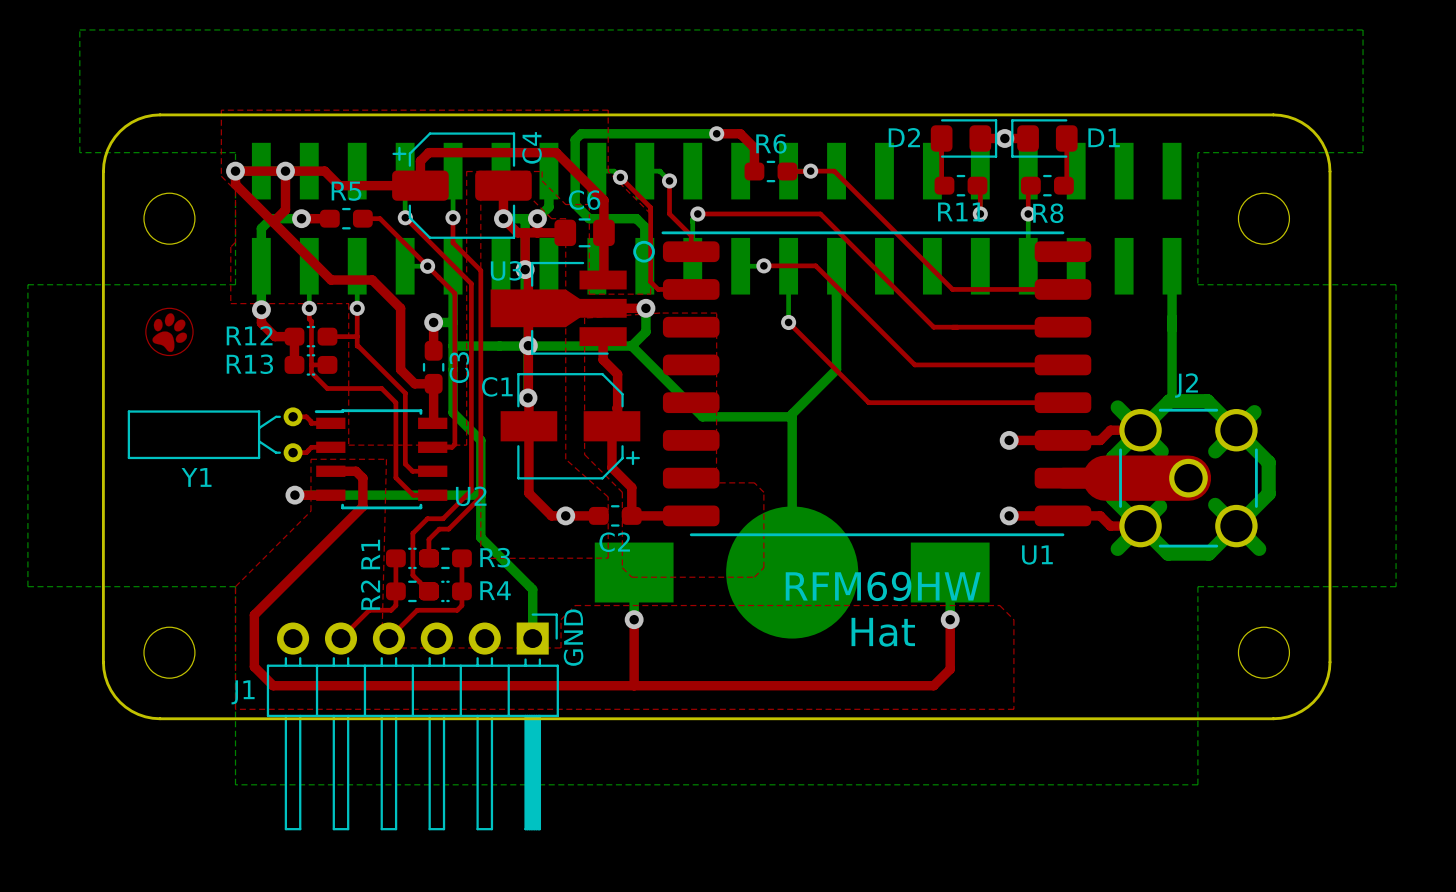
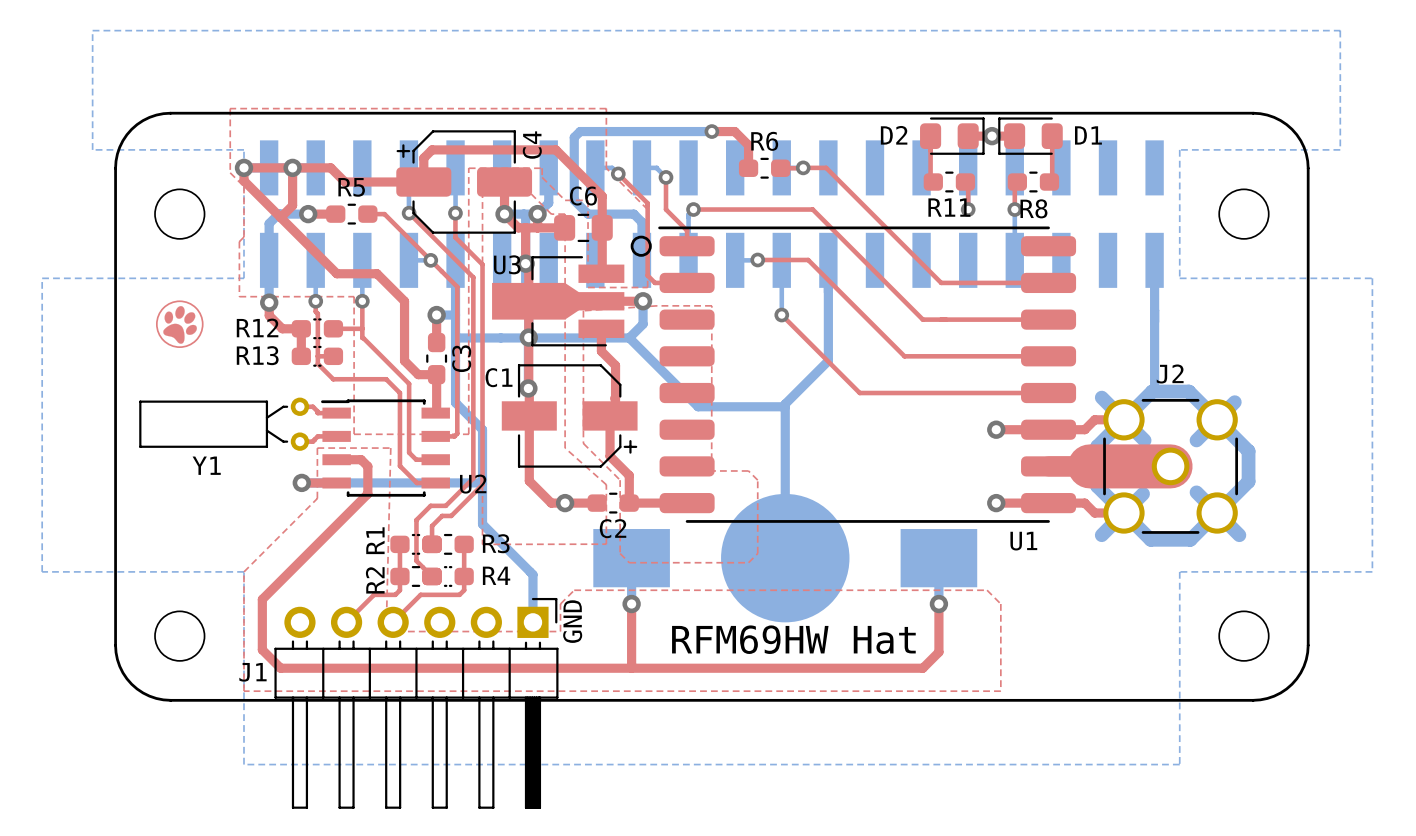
text: RFM69HW (883, 586) -> none
text: Hat (883, 632) -> none
text: none -> RFM69HW Hat (793, 639)

